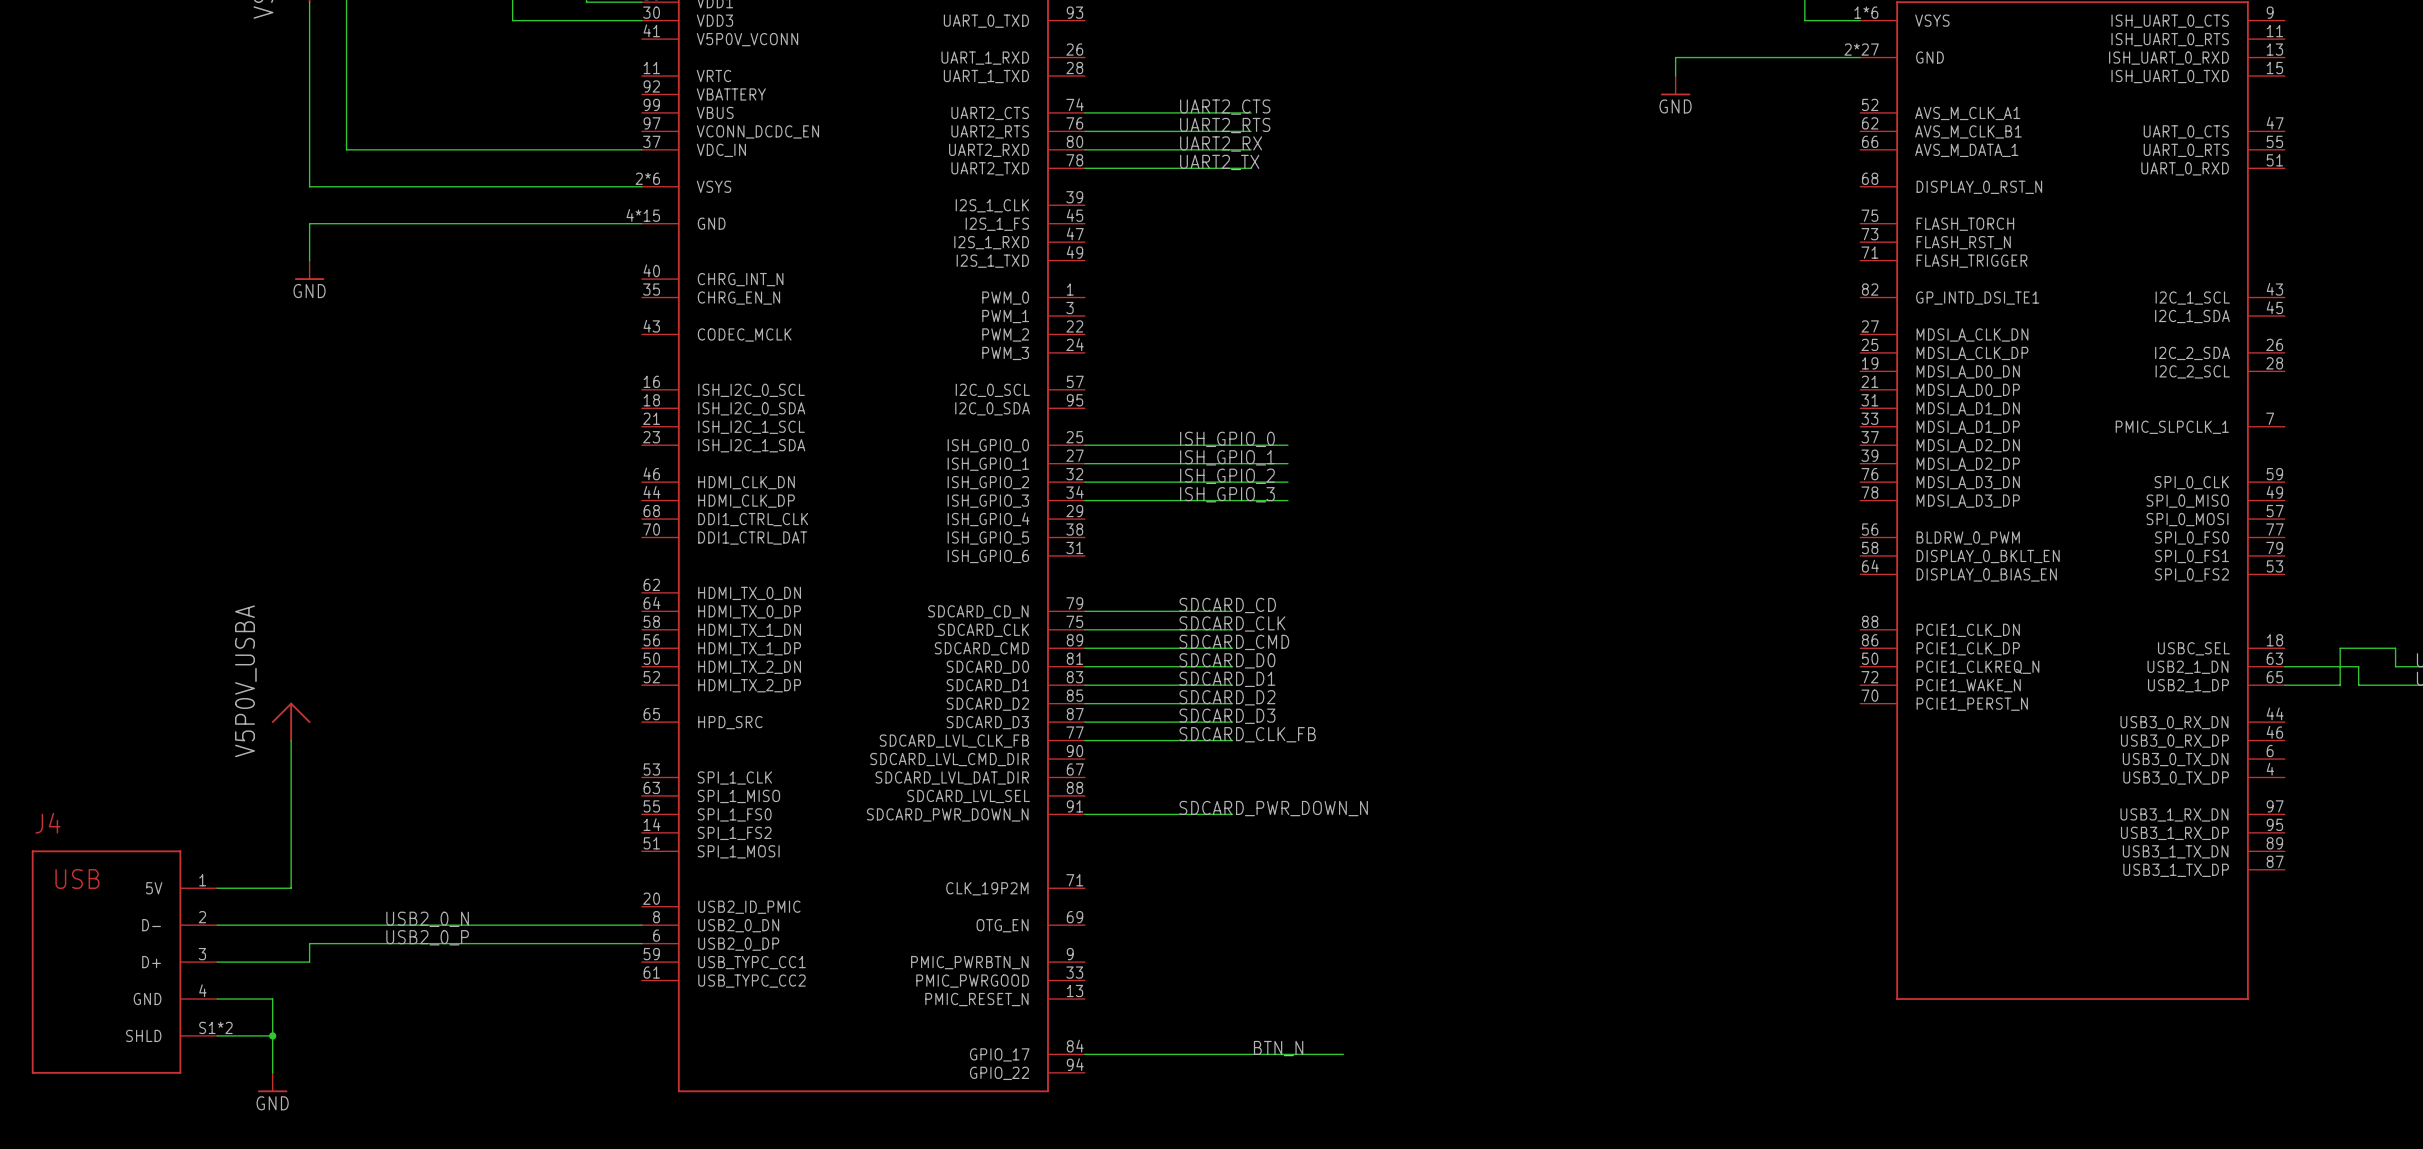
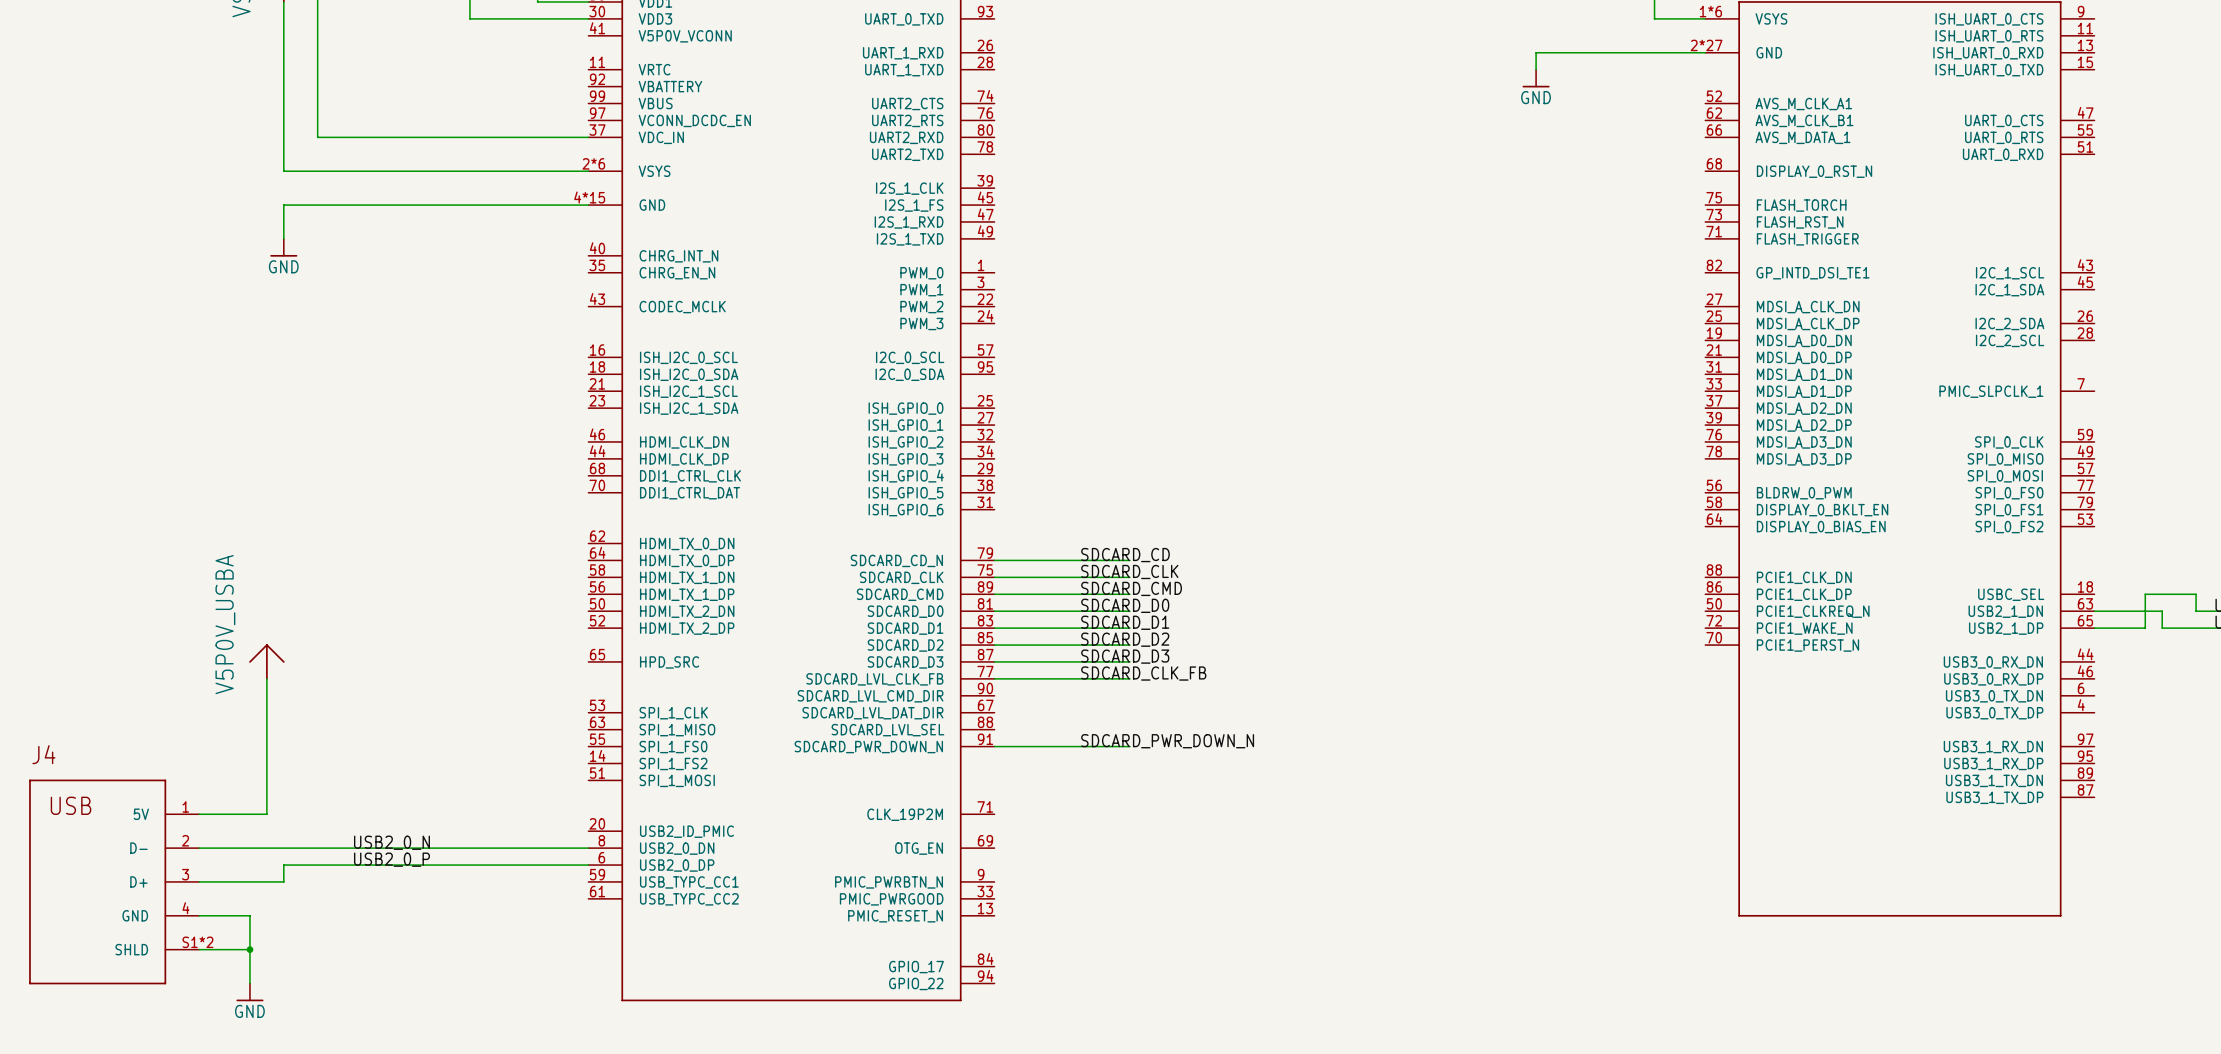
label: UART2_CTS (1225, 107) -> none
wire: (1084, 112) (1251, 112) -> none
label: UART2_RTS (1225, 125) -> none
wire: (1084, 131) (1251, 131) -> none
label: UART2_RX (1221, 144) -> none
wire: (1084, 149) (1251, 149) -> none
label: UART2_TX (1219, 162) -> none
wire: (1084, 168) (1251, 168) -> none
label: ISH_GPIO_0 (1227, 439) -> none
wire: (1084, 445) (1287, 445) -> none
label: ISH_GPIO_1 (1227, 457) -> none
wire: (1084, 463) (1287, 463) -> none
label: ISH_GPIO_2 (1227, 476) -> none
wire: (1084, 482) (1287, 482) -> none
label: ISH_GPIO_3 (1227, 494) -> none
wire: (1084, 500) (1287, 500) -> none
label: BTN_N (1278, 1048) -> none
wire: (1084, 1054) (1343, 1054) -> none

